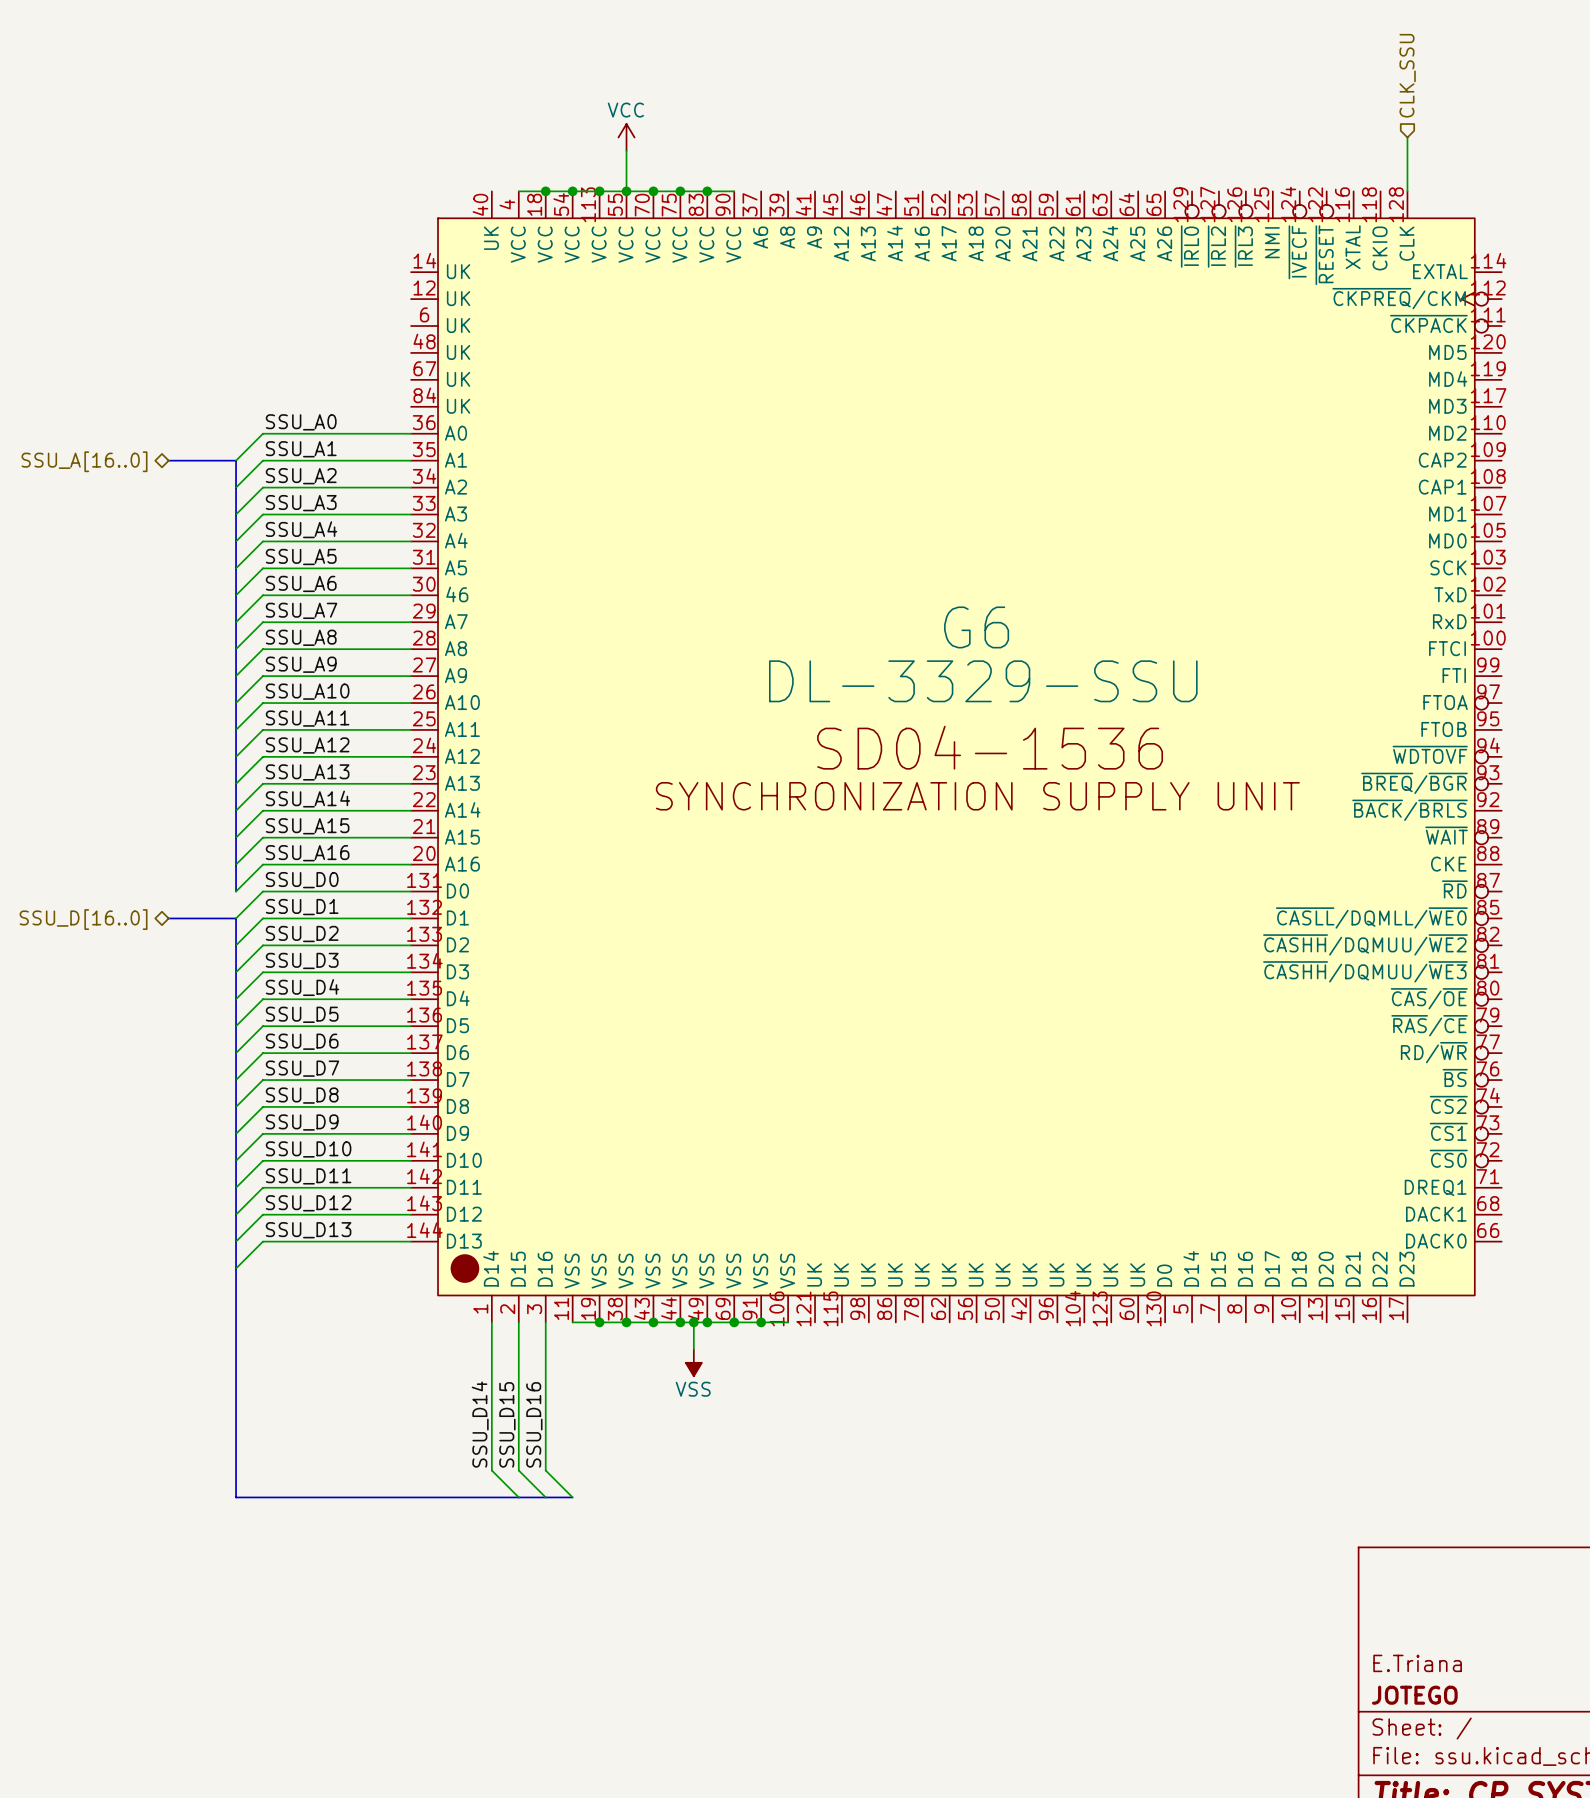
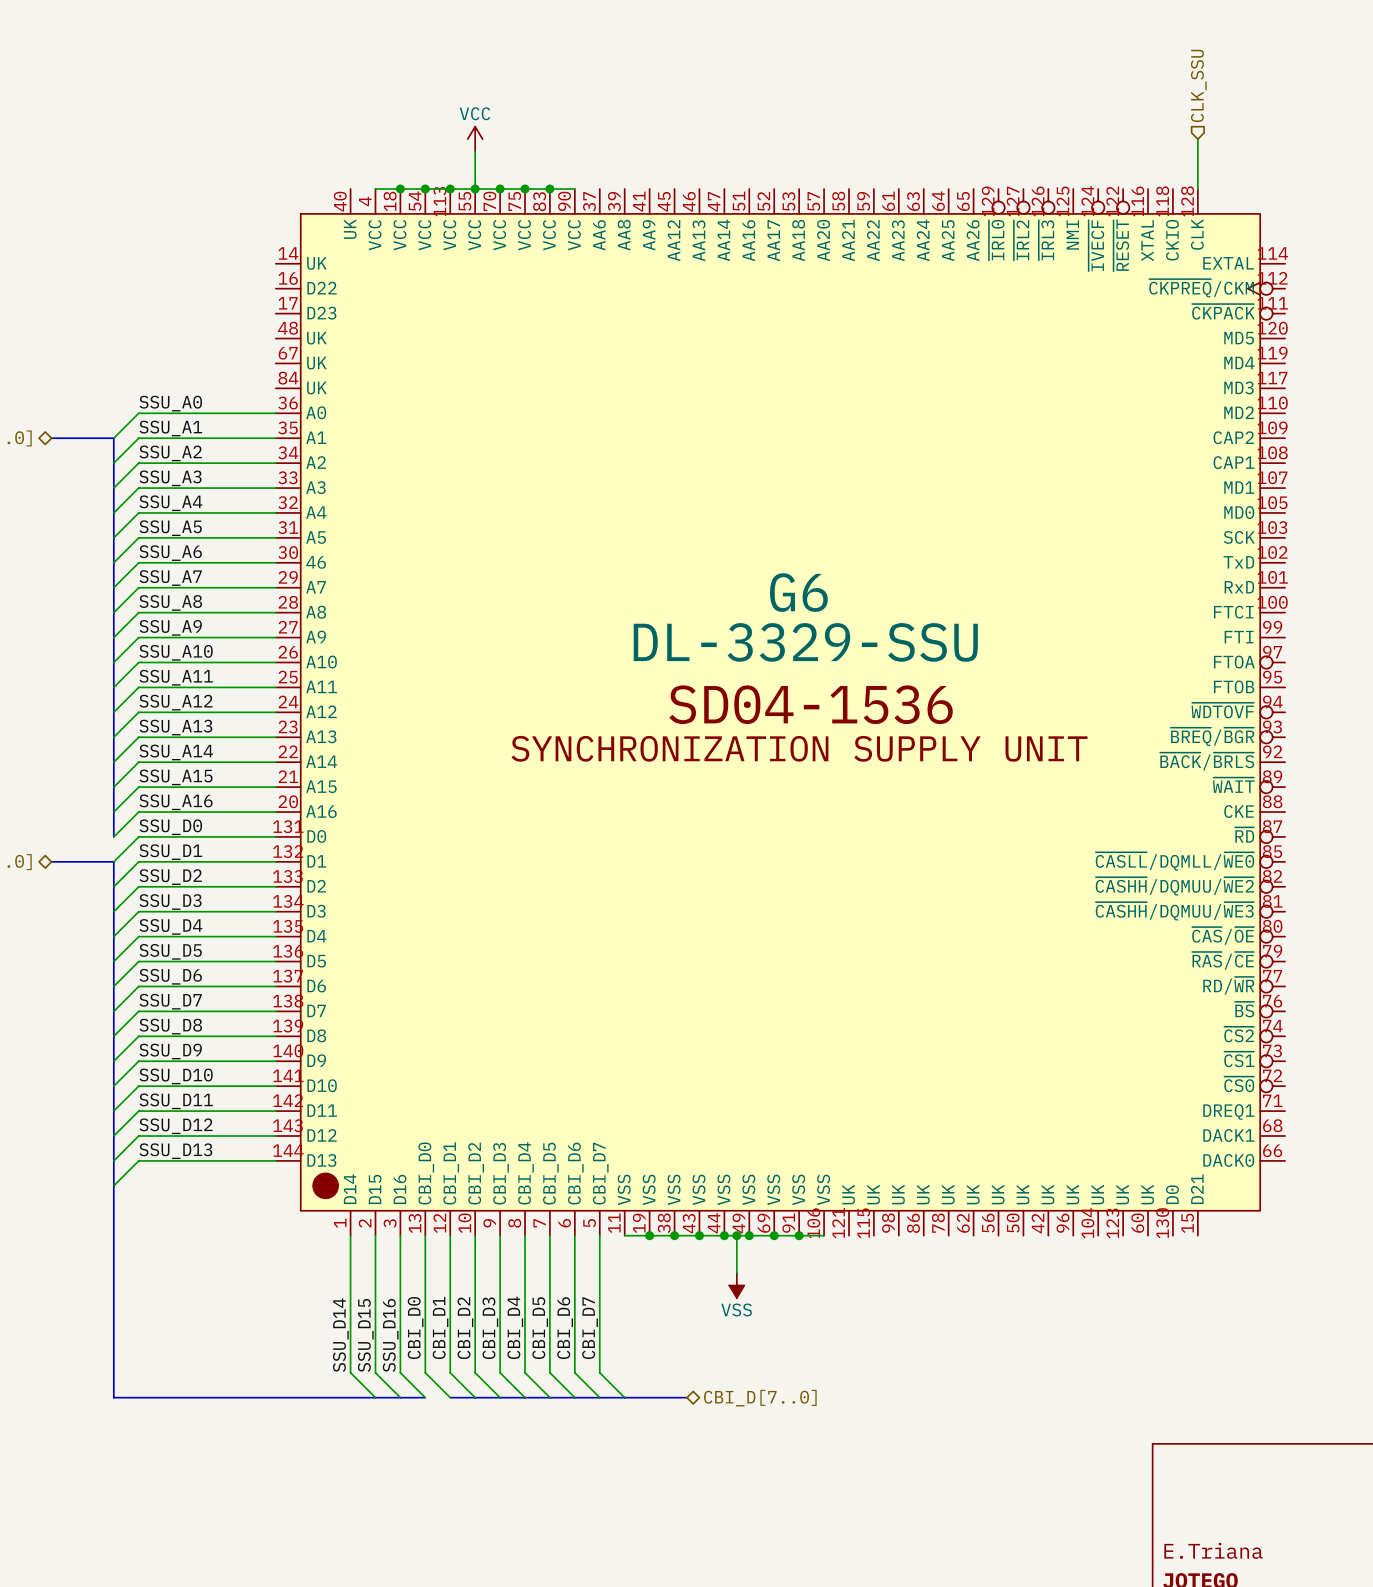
G6 symbol: [411, 191, 1502, 1323] -> [275, 189, 1286, 1236]
wire: (572, 1322) (788, 1322) -> (425, 1235) (425, 1372) (450, 1397)
wire: none -> (450, 1235) (450, 1372) (475, 1397)
junction: (599, 1322) -> none
wire: none -> (475, 1235) (475, 1372) (500, 1397)
junction: (626, 1322) -> none
wire: none -> (500, 1235) (500, 1372) (525, 1397)
junction: (653, 1322) -> none
wire: none -> (525, 1235) (525, 1372) (549, 1397)
junction: (680, 1322) -> none
wire: (693, 1322) (693, 1349) -> none
junction: (693, 1322) -> none
wire: none -> (549, 1235) (549, 1372) (574, 1397)
junction: (707, 1322) -> none
wire: none -> (574, 1235) (574, 1372) (599, 1397)
junction: (734, 1322) -> none
wire: none -> (599, 1235) (599, 1372) (624, 1397)
junction: (761, 1322) -> none
wire: none -> (624, 1235) (824, 1235)
junction: none -> (649, 1235)
junction: none -> (674, 1235)
junction: none -> (699, 1235)
junction: none -> (724, 1235)
wire: none -> (736, 1235) (736, 1273)
junction: none -> (736, 1235)
junction: none -> (749, 1235)
junction: none -> (774, 1235)
junction: none -> (799, 1235)
power symbol position: VSS (693, 1362) -> VSS (736, 1285)
label: none -> CBI_D4 (515, 1327)
label: none -> CBI_D7 (590, 1328)
label: none -> CBI_D0 (415, 1328)
label: none -> CBI_D1 (440, 1327)
label: none -> CBI_D2 (465, 1328)
label: none -> CBI_D3 (490, 1328)
label: none -> CBI_D5 (540, 1328)
label: none -> CBI_D6 (565, 1328)
bus: none -> (450, 1397) (686, 1397)
hierarchical label: none -> CBI_D[7..0] (760, 1398)

